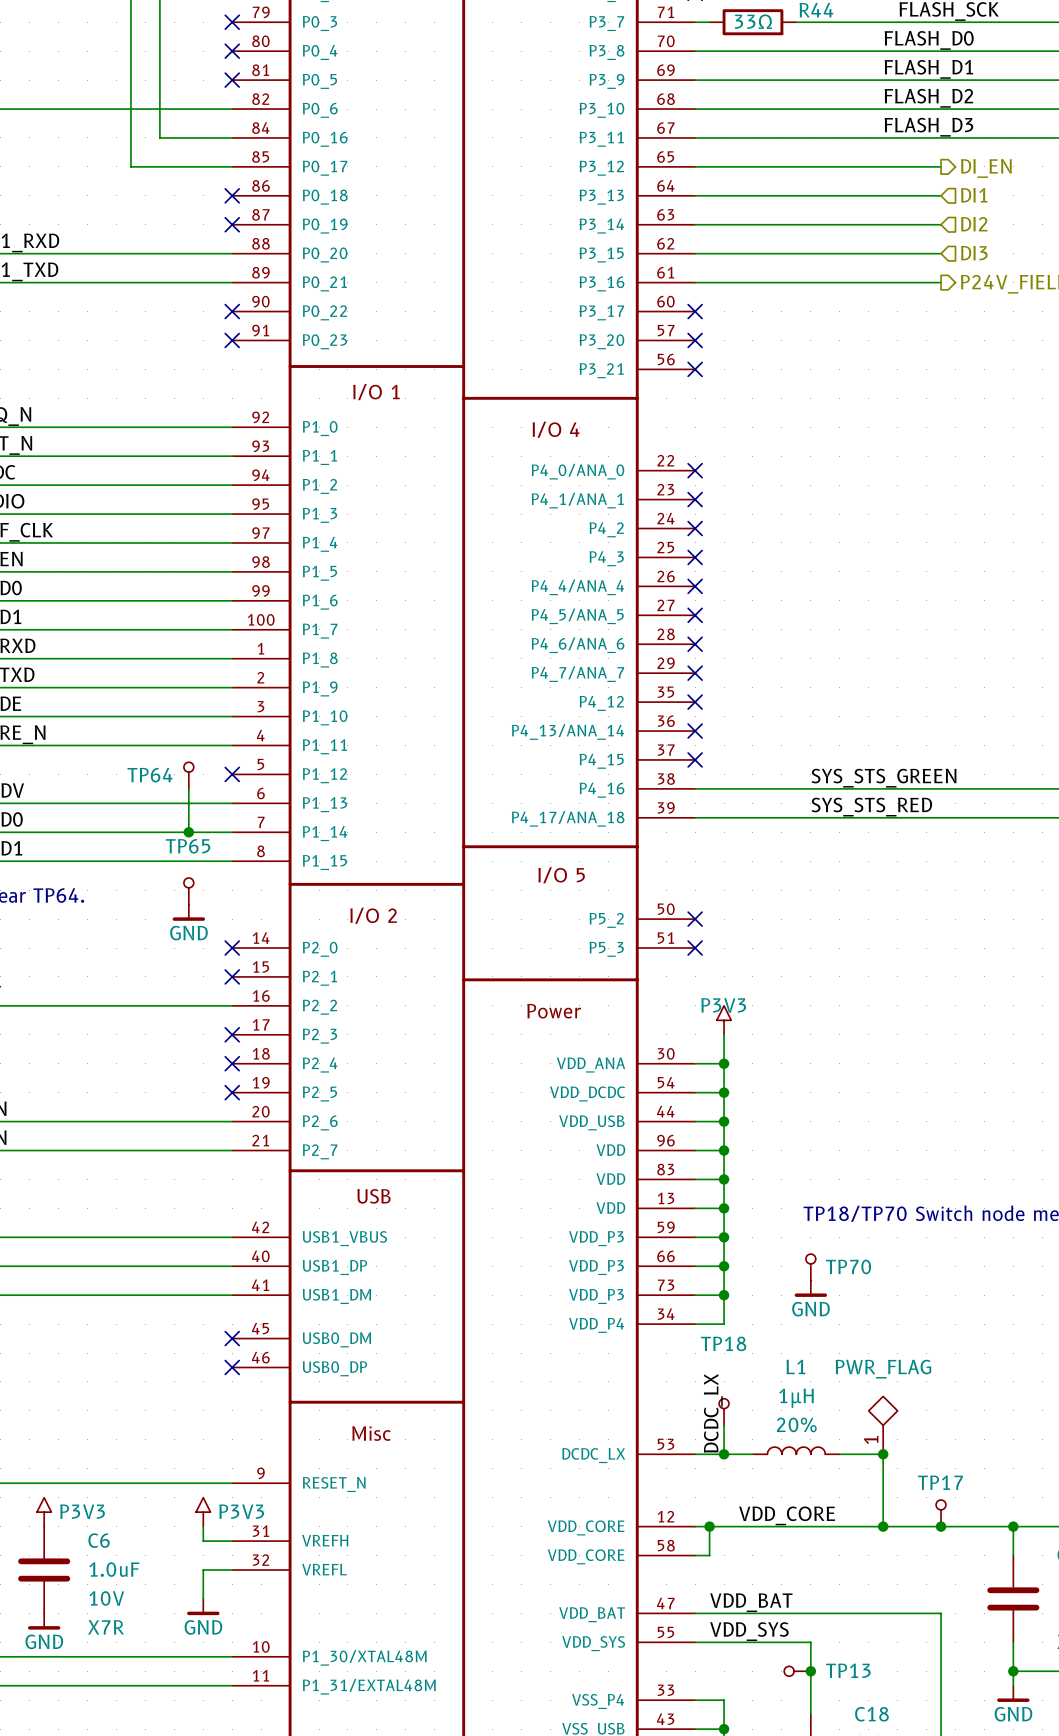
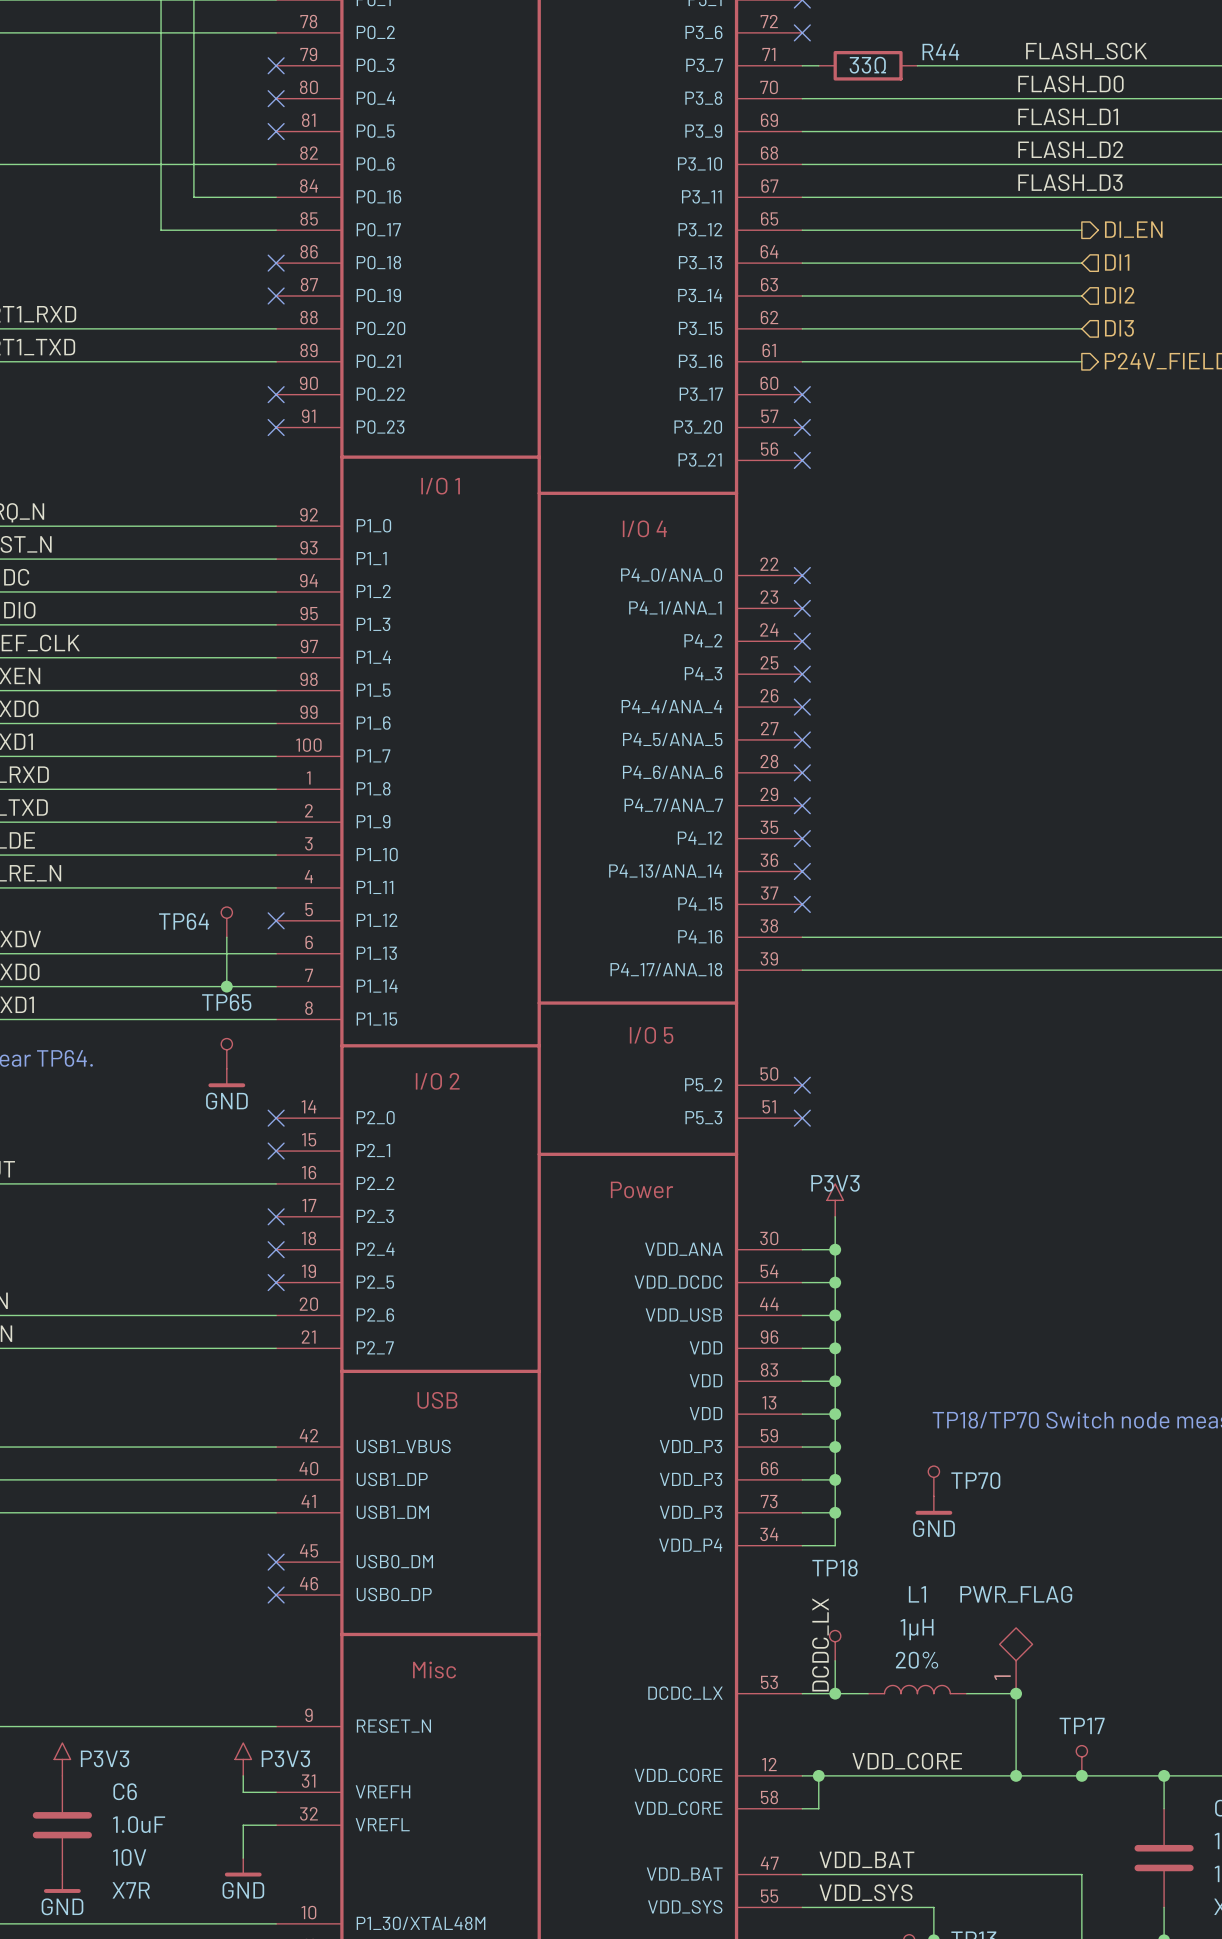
label: SYS_STS_GREEN (884, 778) -> none
label: SYS_STS_RED (871, 807) -> none

